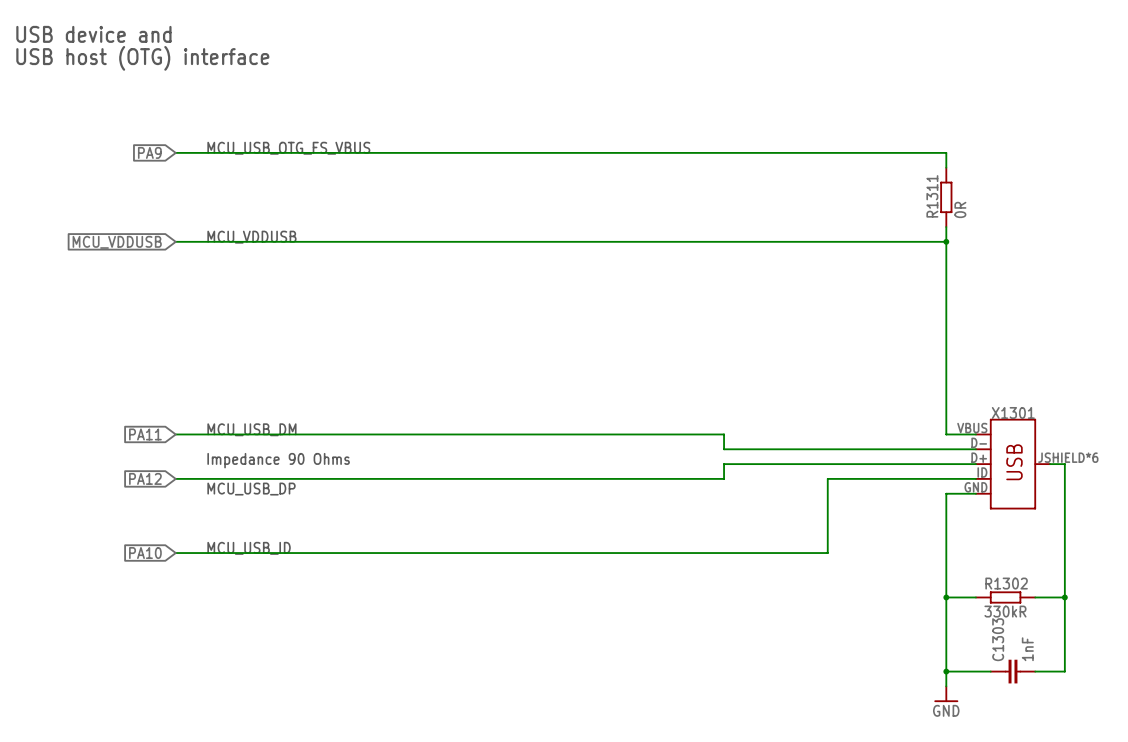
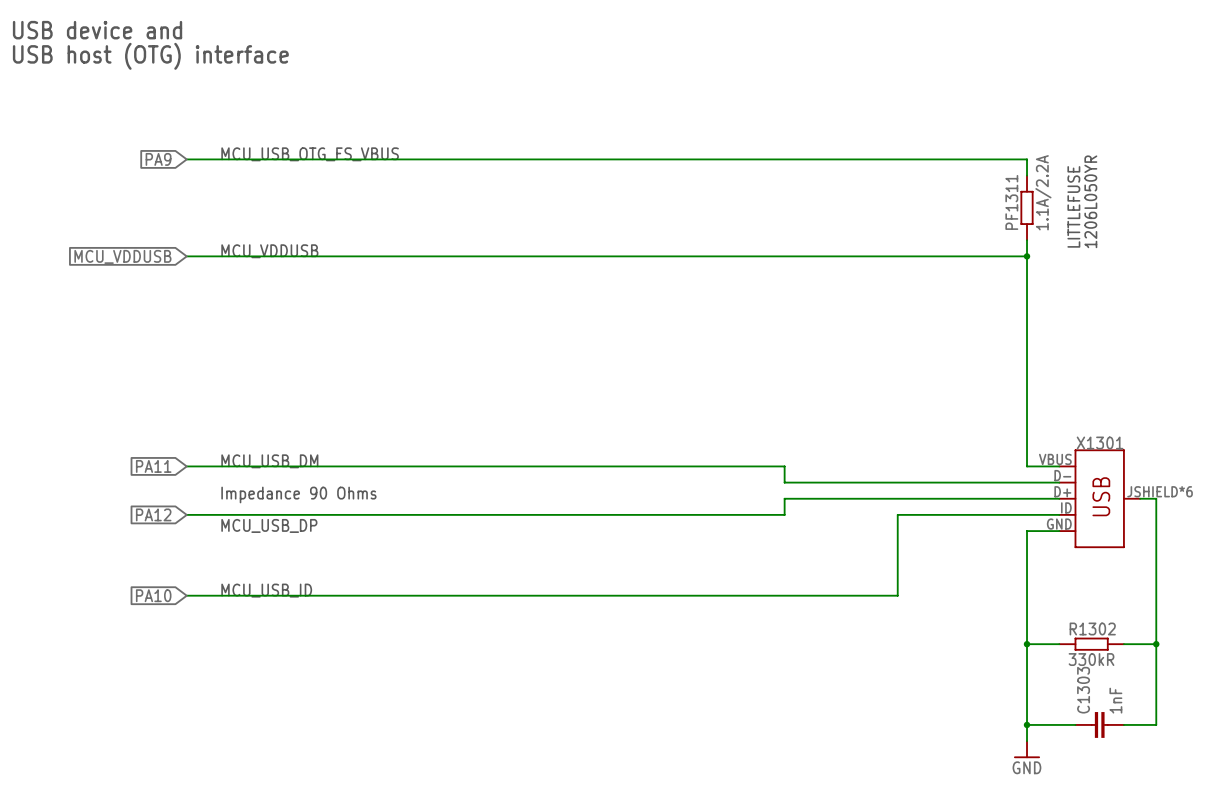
text: none -> 1206L050YR (1090, 201)
R1311 name: R1311 (932, 196) -> PF1311 (1011, 202)
text: none -> LITTLEFUSE (1073, 206)
R1311 value: 0R (960, 209) -> 1.1A/2.2A (1043, 192)

